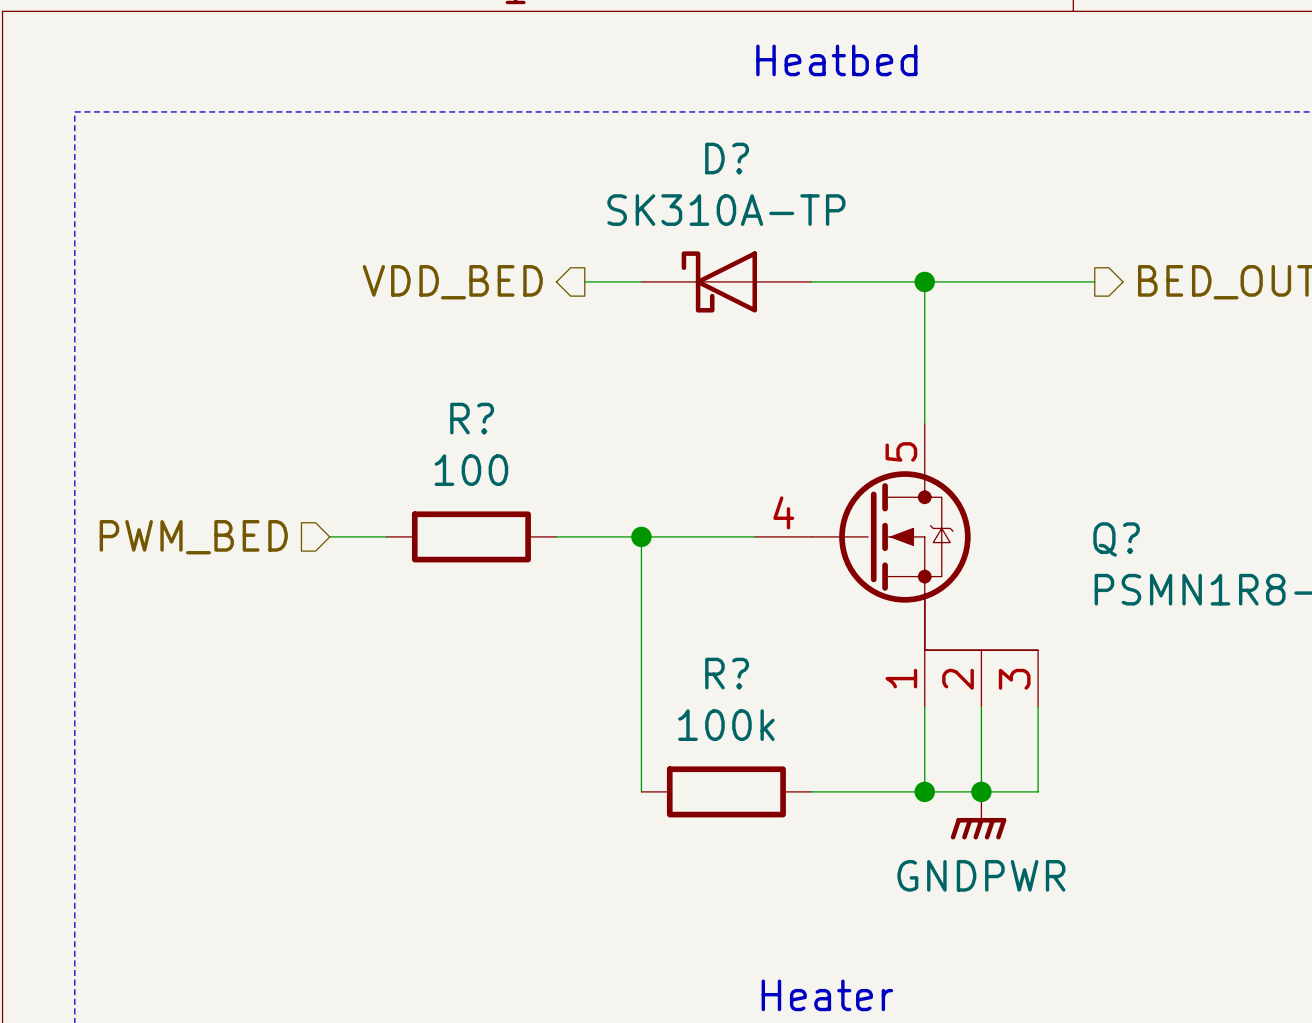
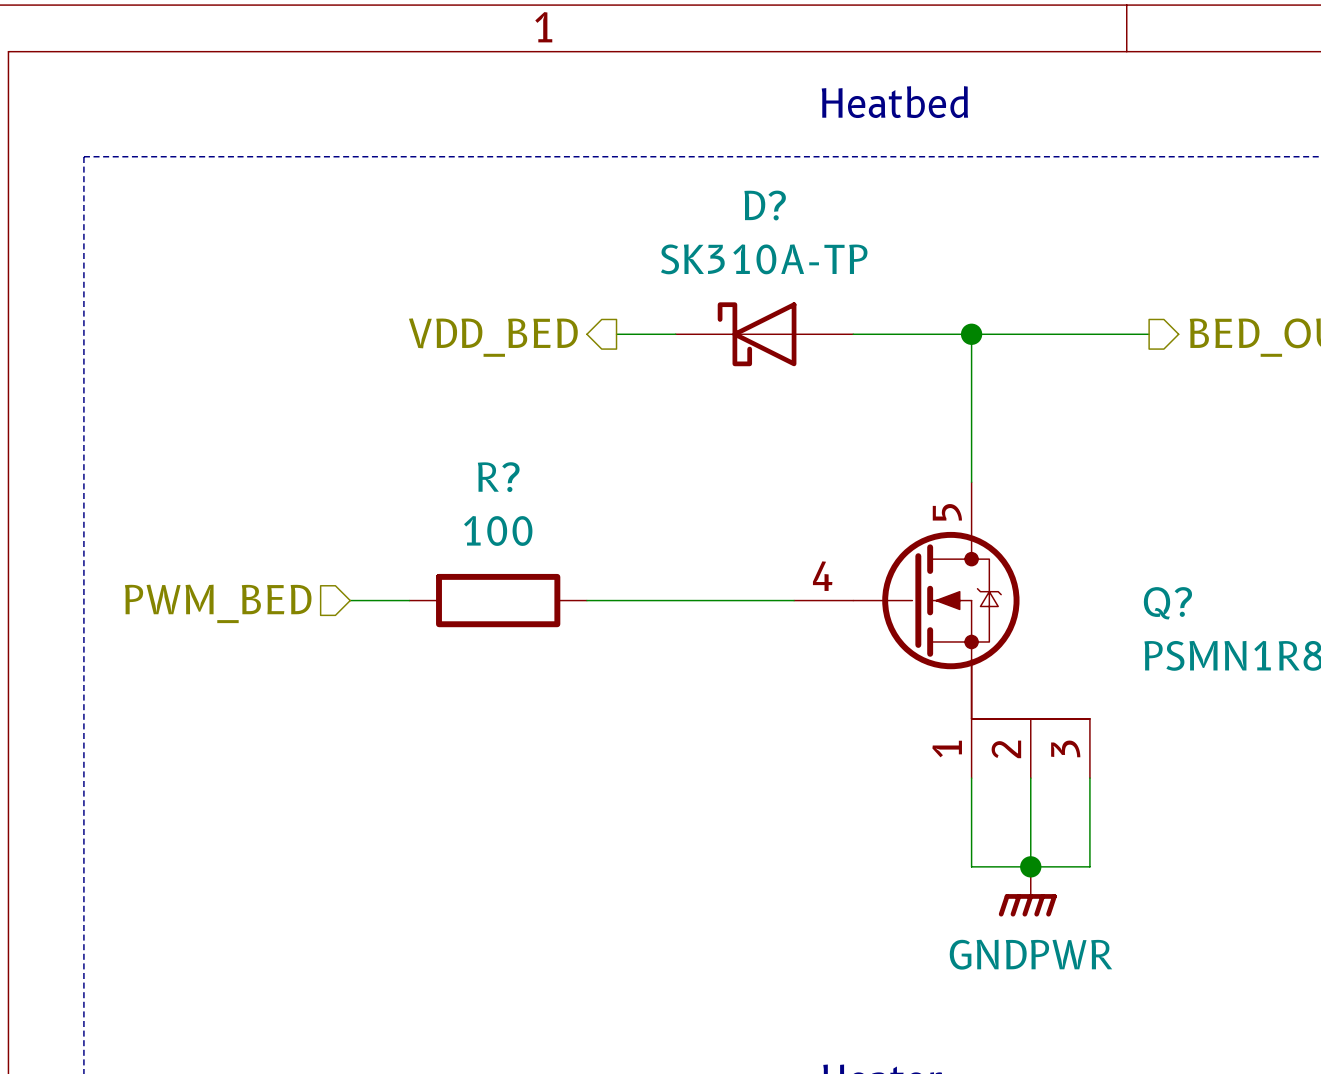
wire: (641, 536) (641, 791) -> none
junction: (641, 536) -> none
R?: 100k (726, 791) -> none
wire: (811, 791) (924, 791) -> none
junction: (924, 791) -> none

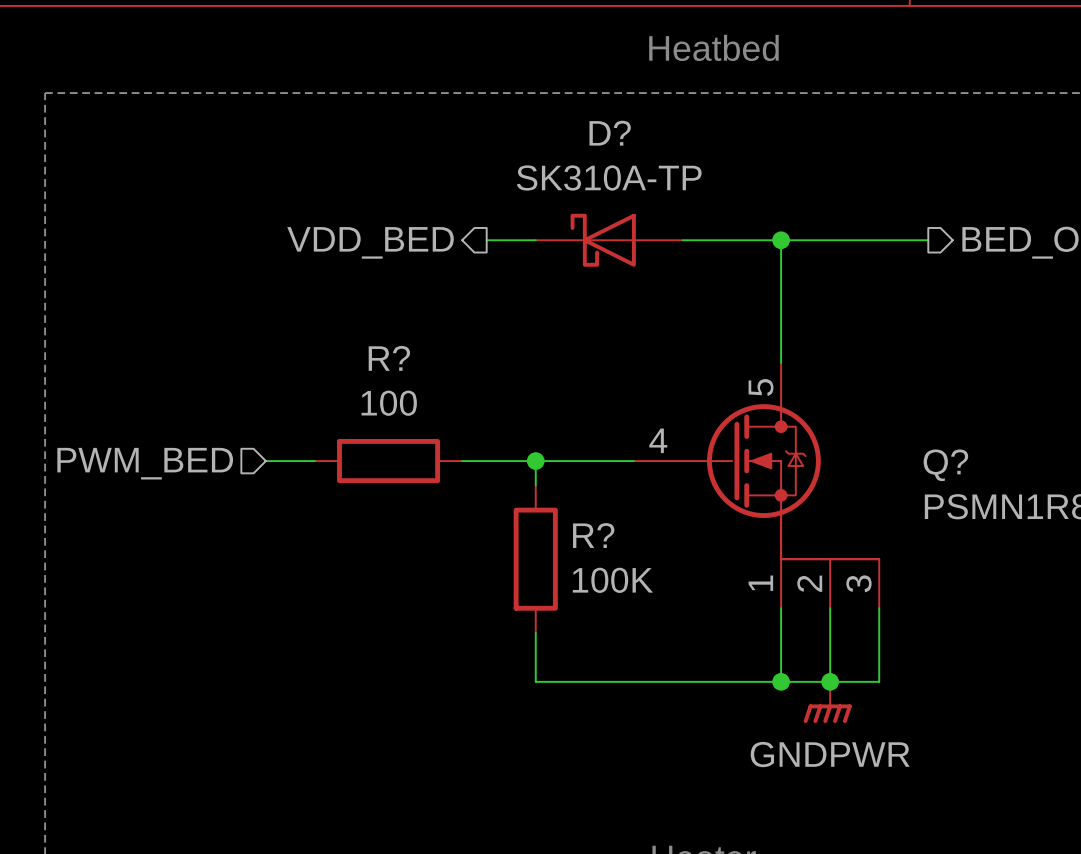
wire: none -> (535, 461) (535, 485)
junction: none -> (535, 461)
R?: none -> 100K (535, 559)
wire: none -> (535, 632) (535, 681) (781, 681)
junction: none -> (781, 681)

